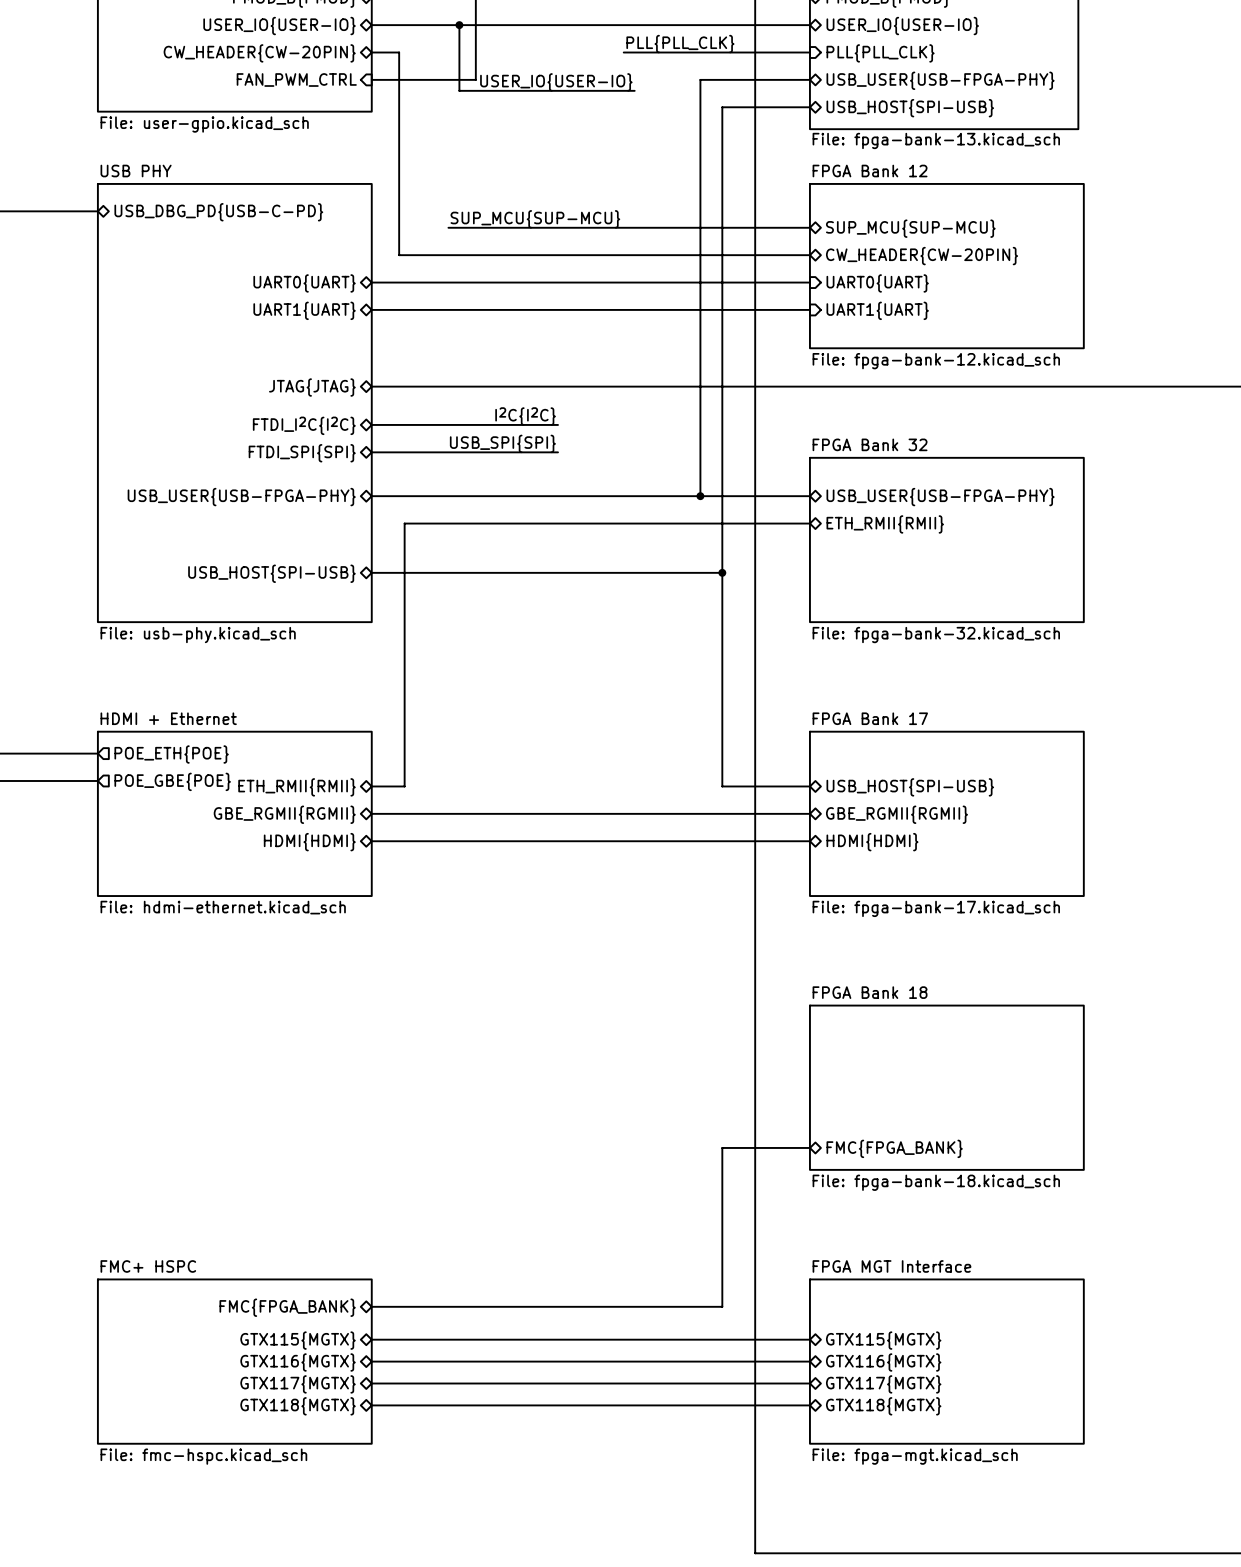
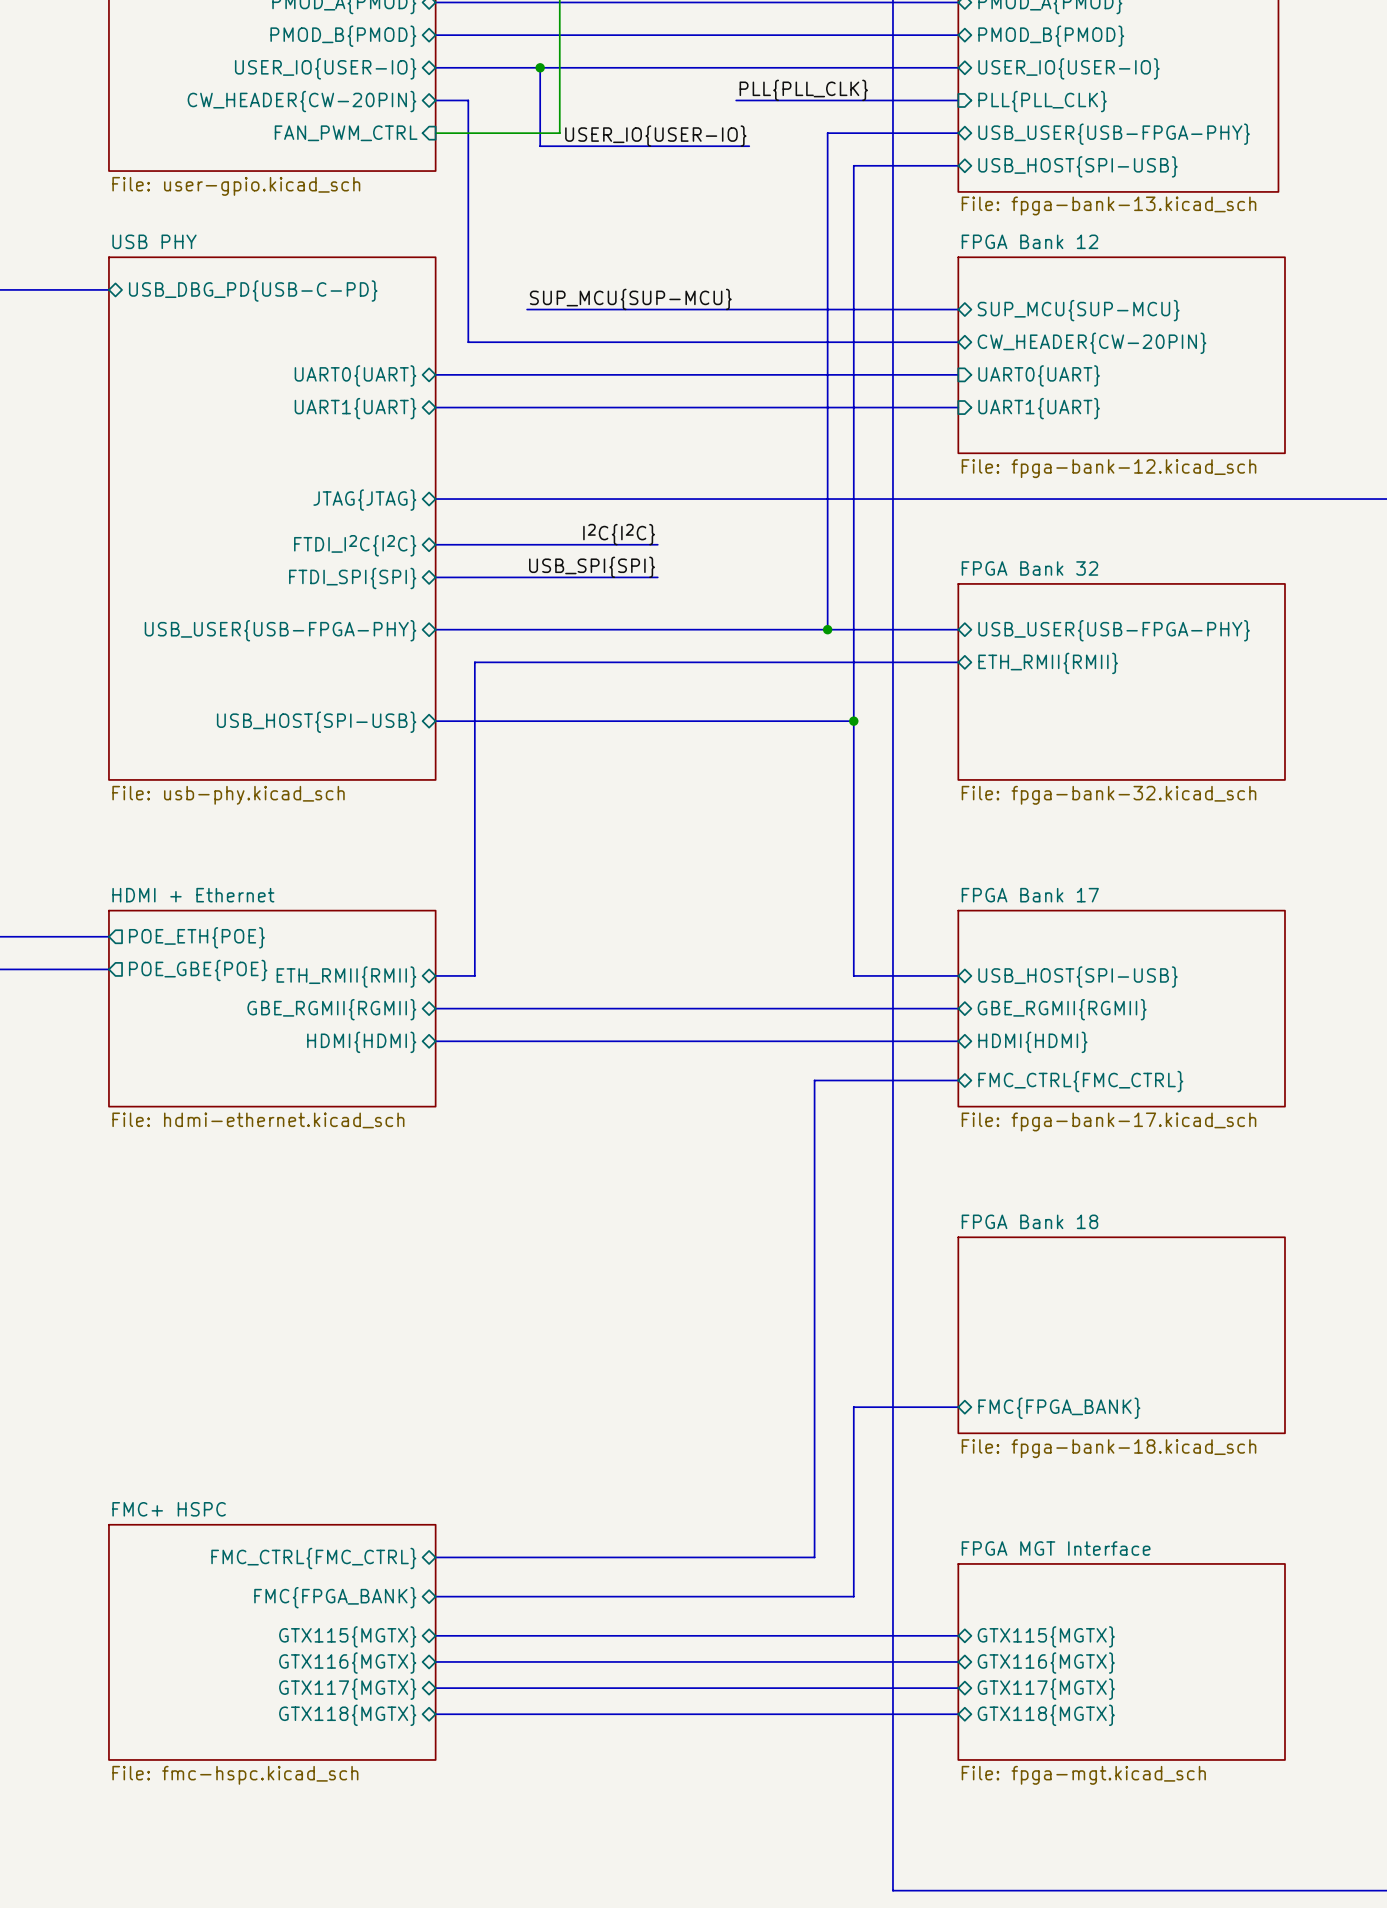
bus: none -> (958, 1080) (814, 1080) (814, 1557) (435, 1557)
sheet pin: none -> FMC_CTRL{FMC_CTRL} (1080, 1081)
sheet pin: none -> FMC_CTRL{FMC_CTRL} (313, 1558)
sheet FMC+ HSPC: none -> File: fmc-hspc.kicad_sch (272, 1642)
sheet FMC+ HSPC: File: fmc-hspc.kicad_sch (234, 1361) -> none

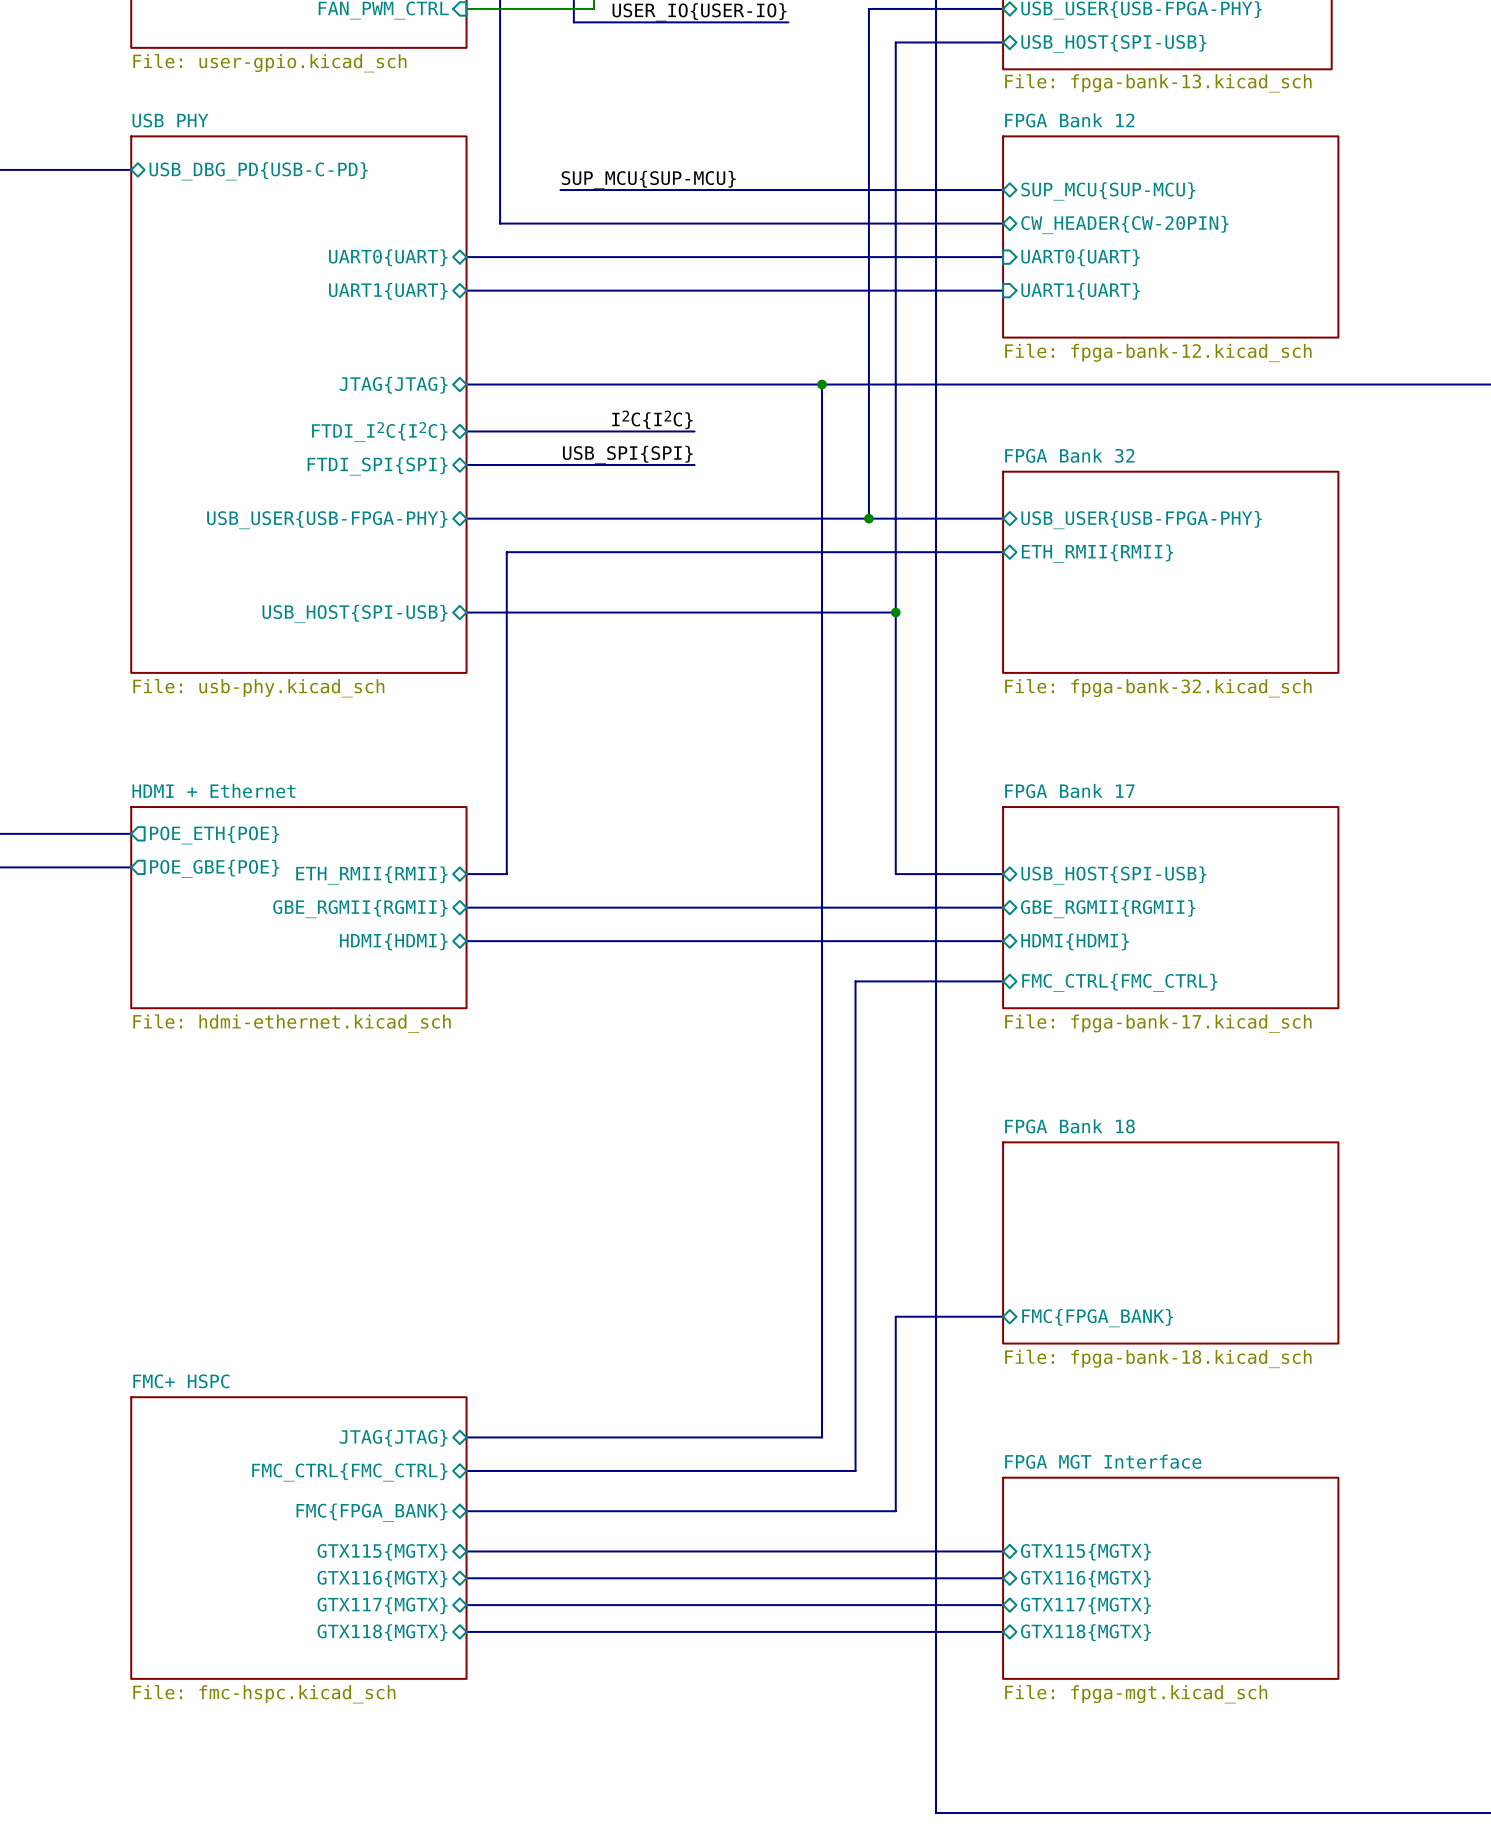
bus: none -> (821, 384) (821, 1437) (466, 1437)
junction: none -> (821, 384)
sheet pin: none -> JTAG{JTAG} (393, 1438)
sheet FMC+ HSPC: none -> File: fmc-hspc.kicad_sch (298, 1538)
sheet FMC+ HSPC: File: fmc-hspc.kicad_sch (272, 1642) -> none

